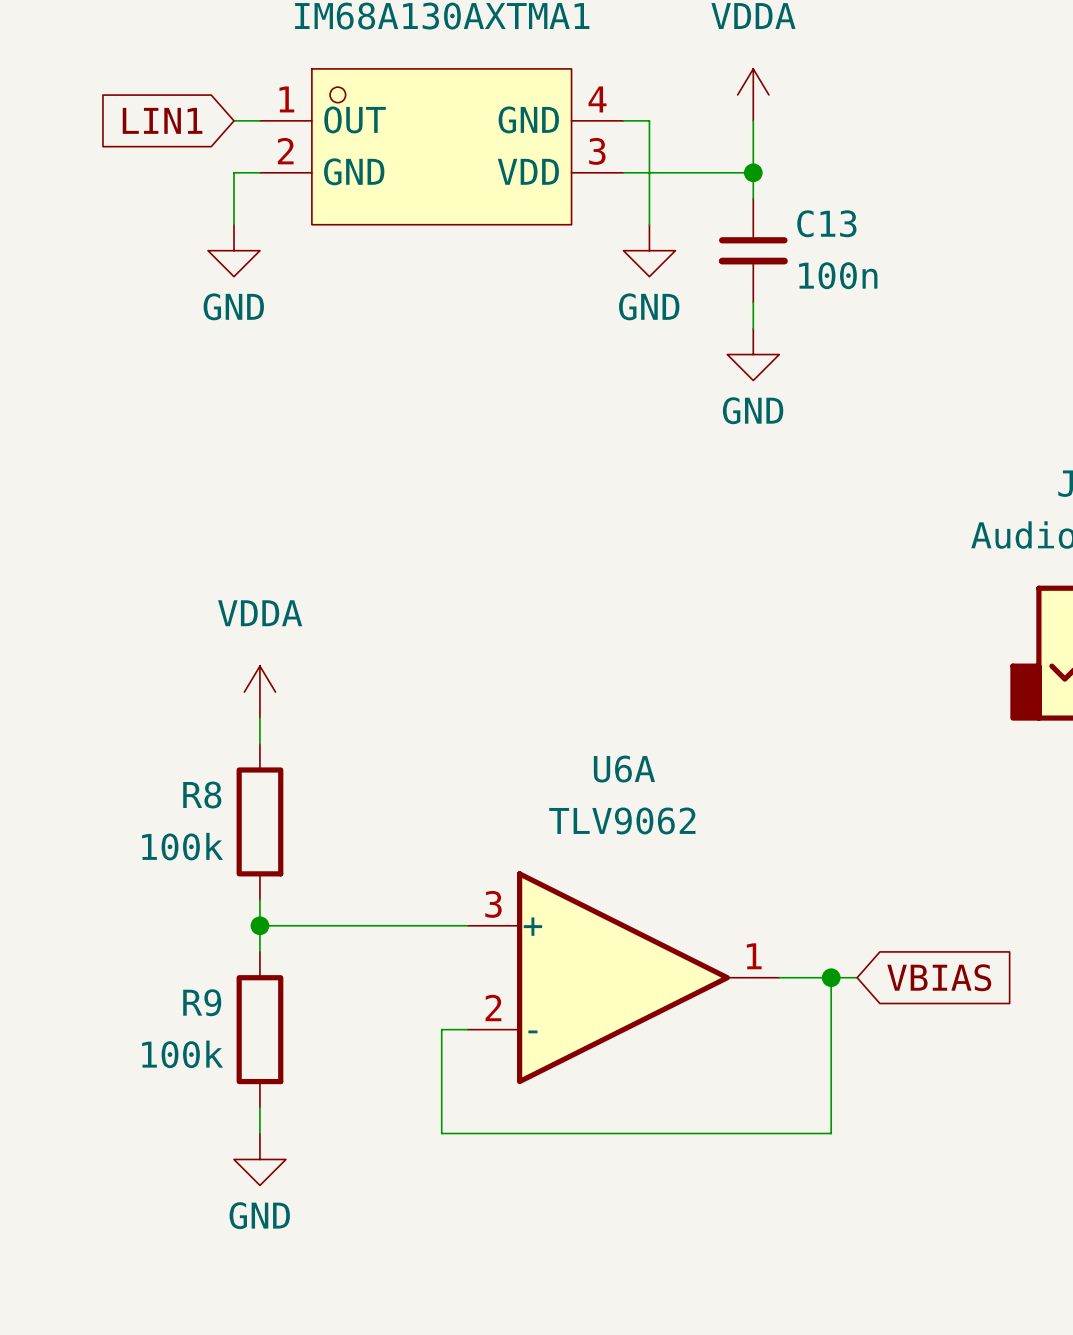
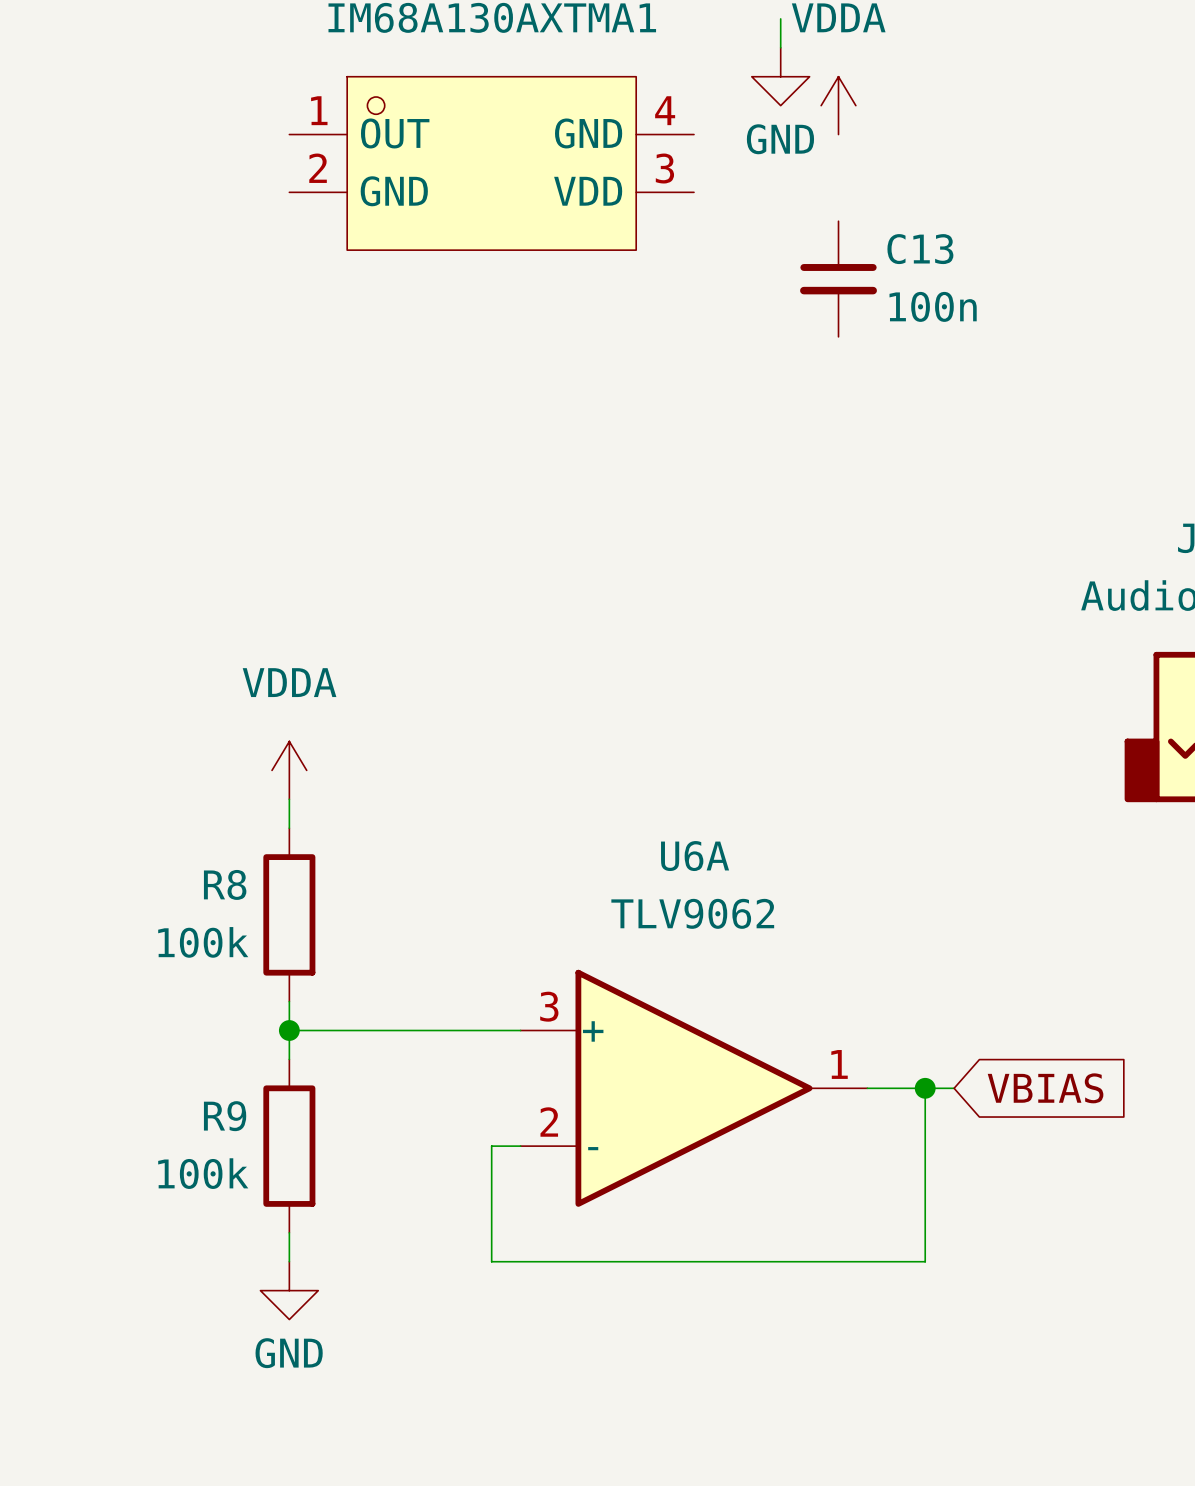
power symbol: none -> GND (780, 76)
global label: LIN1 (162, 120) -> none
wire: (233, 120) (259, 120) -> none
wire: (623, 120) (649, 120) (649, 224) -> none
wire: (753, 120) (753, 198) -> none
wire: (259, 172) (233, 172) (233, 224) -> none
wire: (623, 172) (753, 172) -> none
junction: (753, 172) -> none
power symbol: GND (233, 250) -> none
power symbol: GND (649, 250) -> none
wire: (753, 302) (753, 328) -> (780, 18) (780, 47)
power symbol: GND (753, 354) -> none

